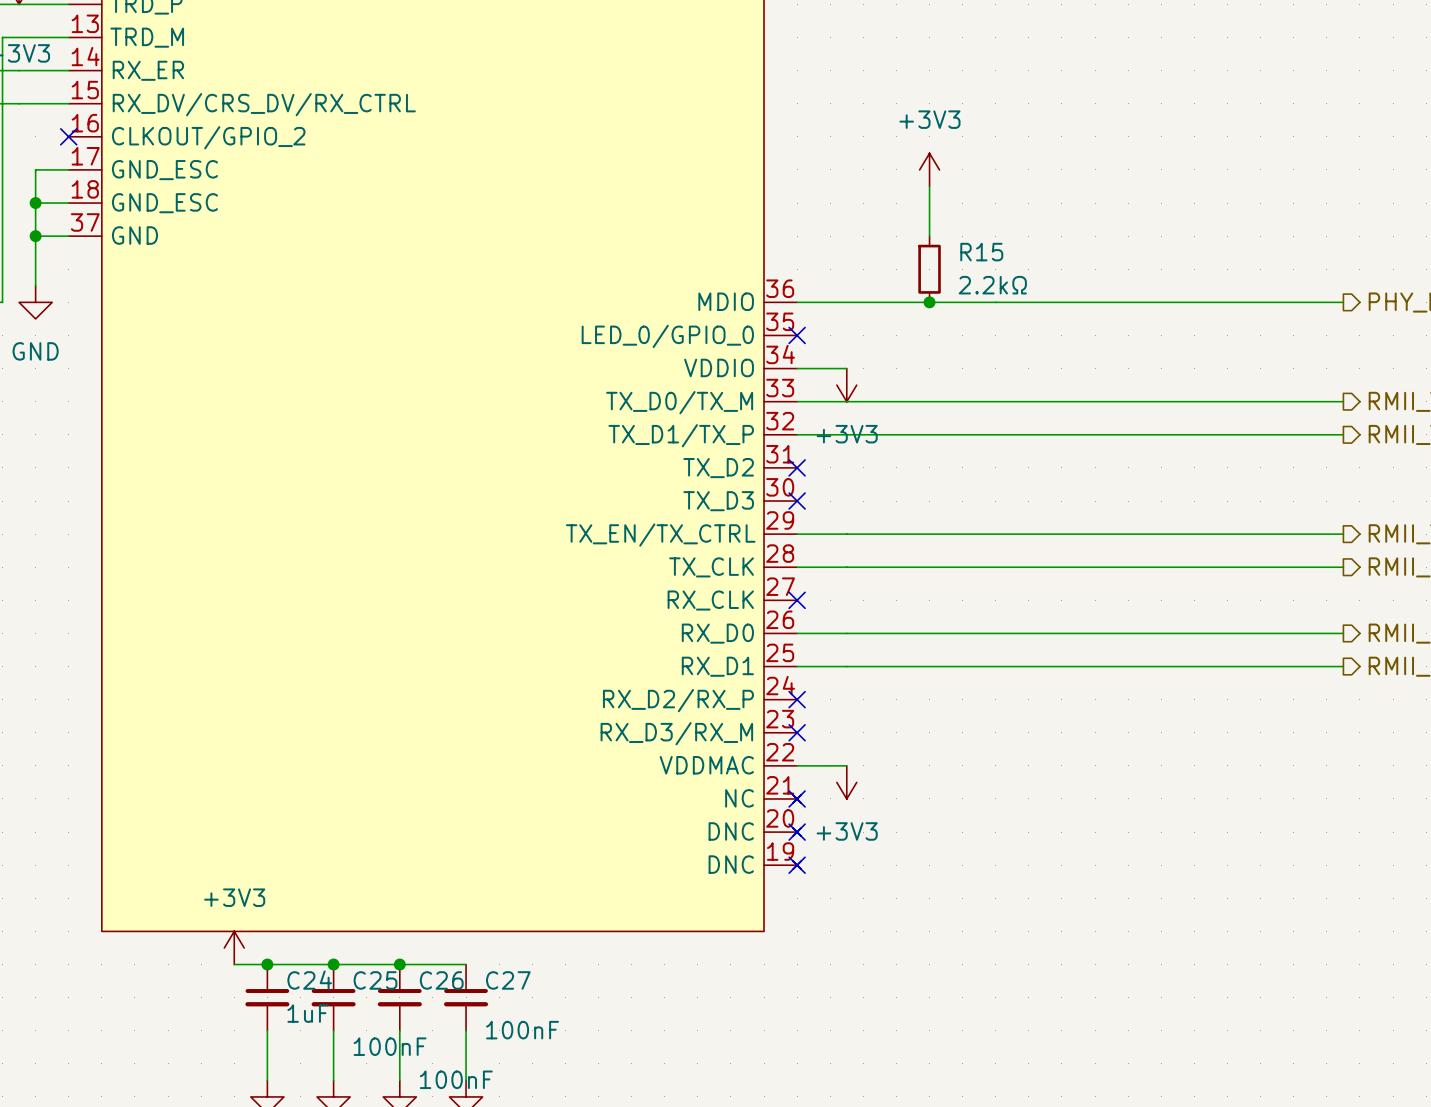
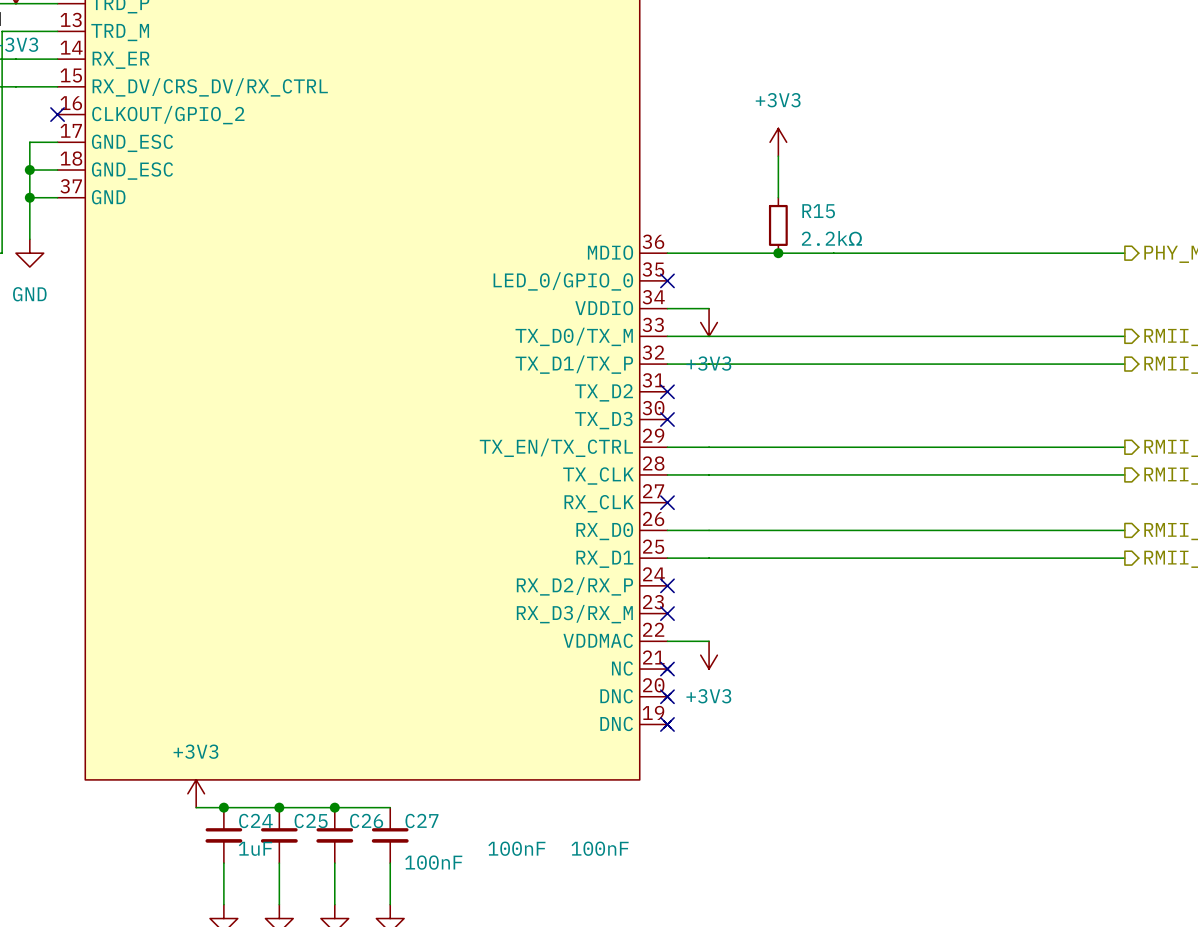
C25 value position: 100nF (390, 1046) -> 100nF (516, 848)
C26 value position: 100nF (456, 1079) -> 100nF (600, 848)

